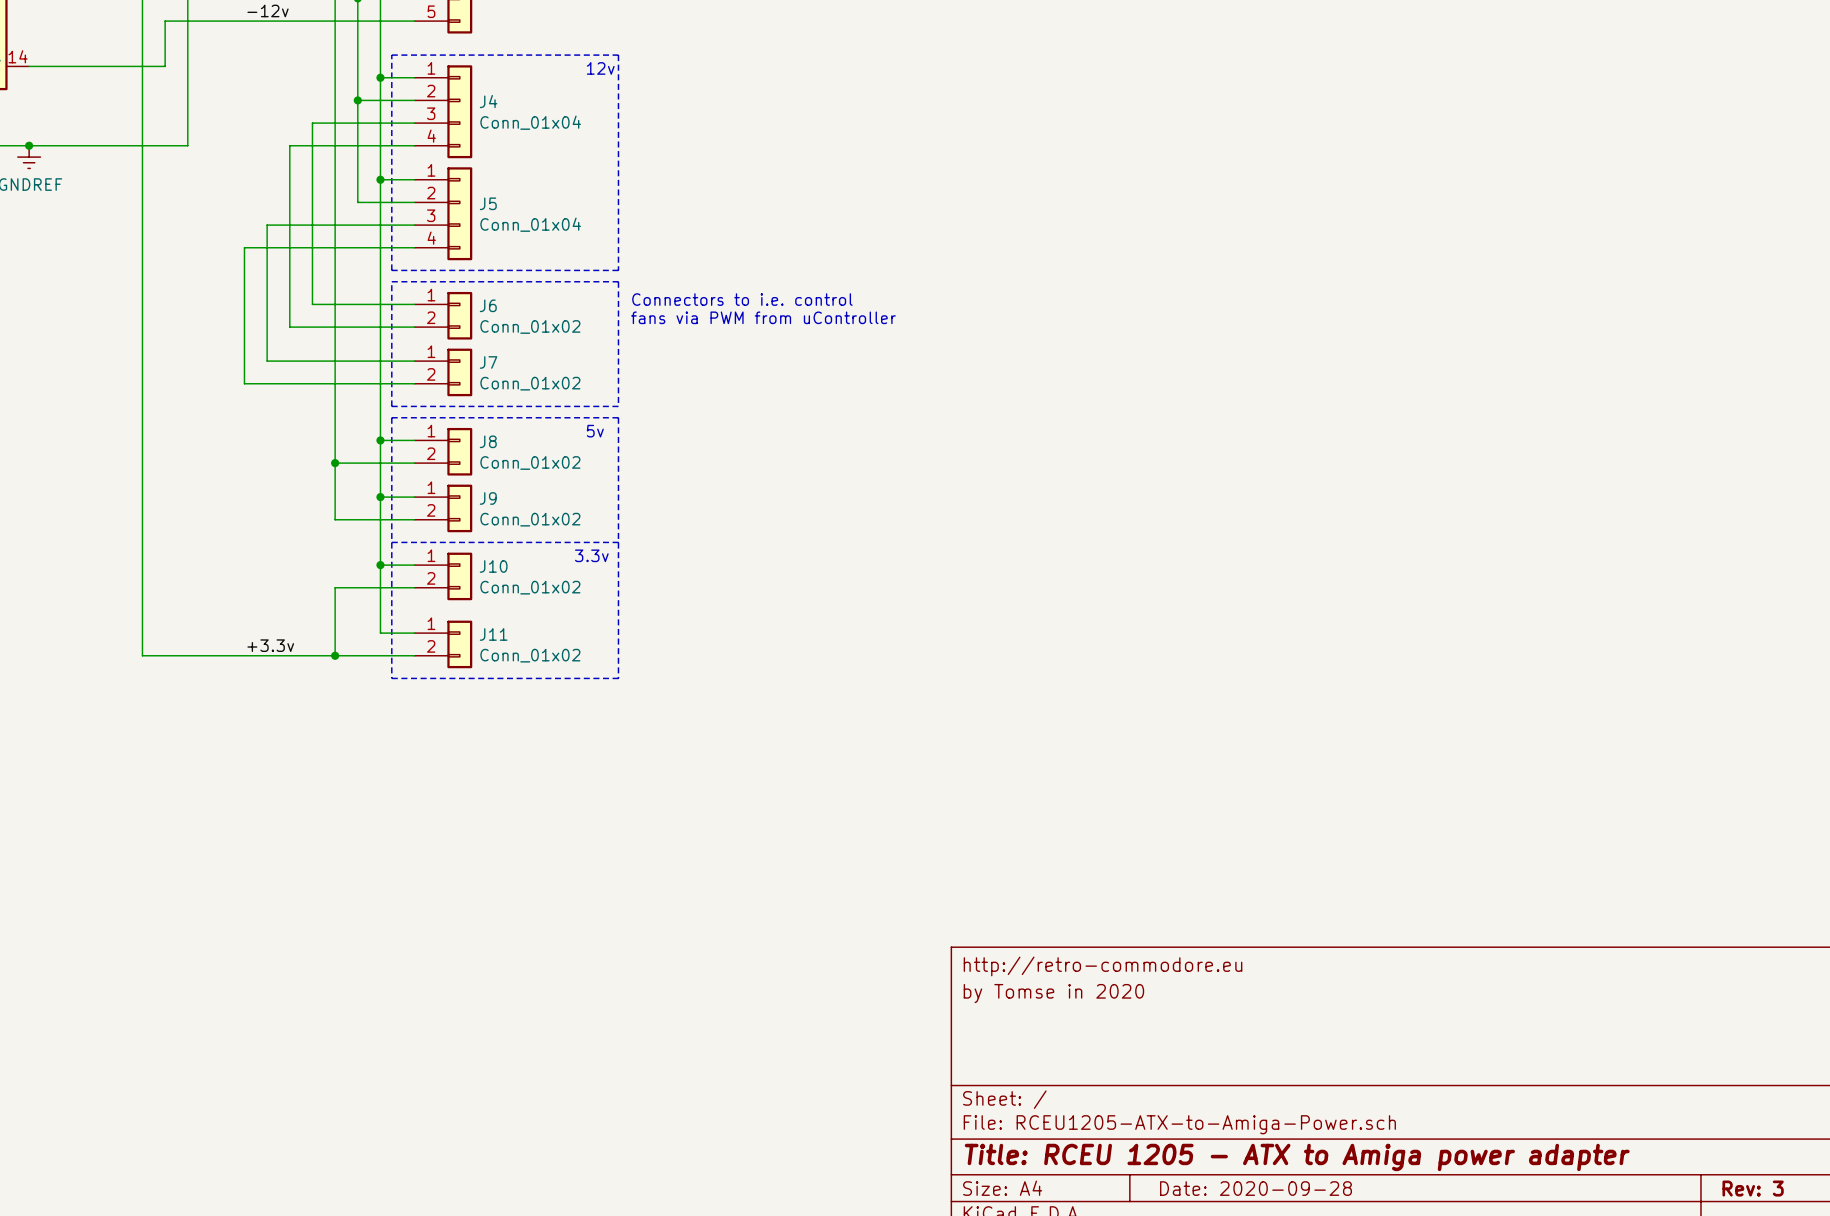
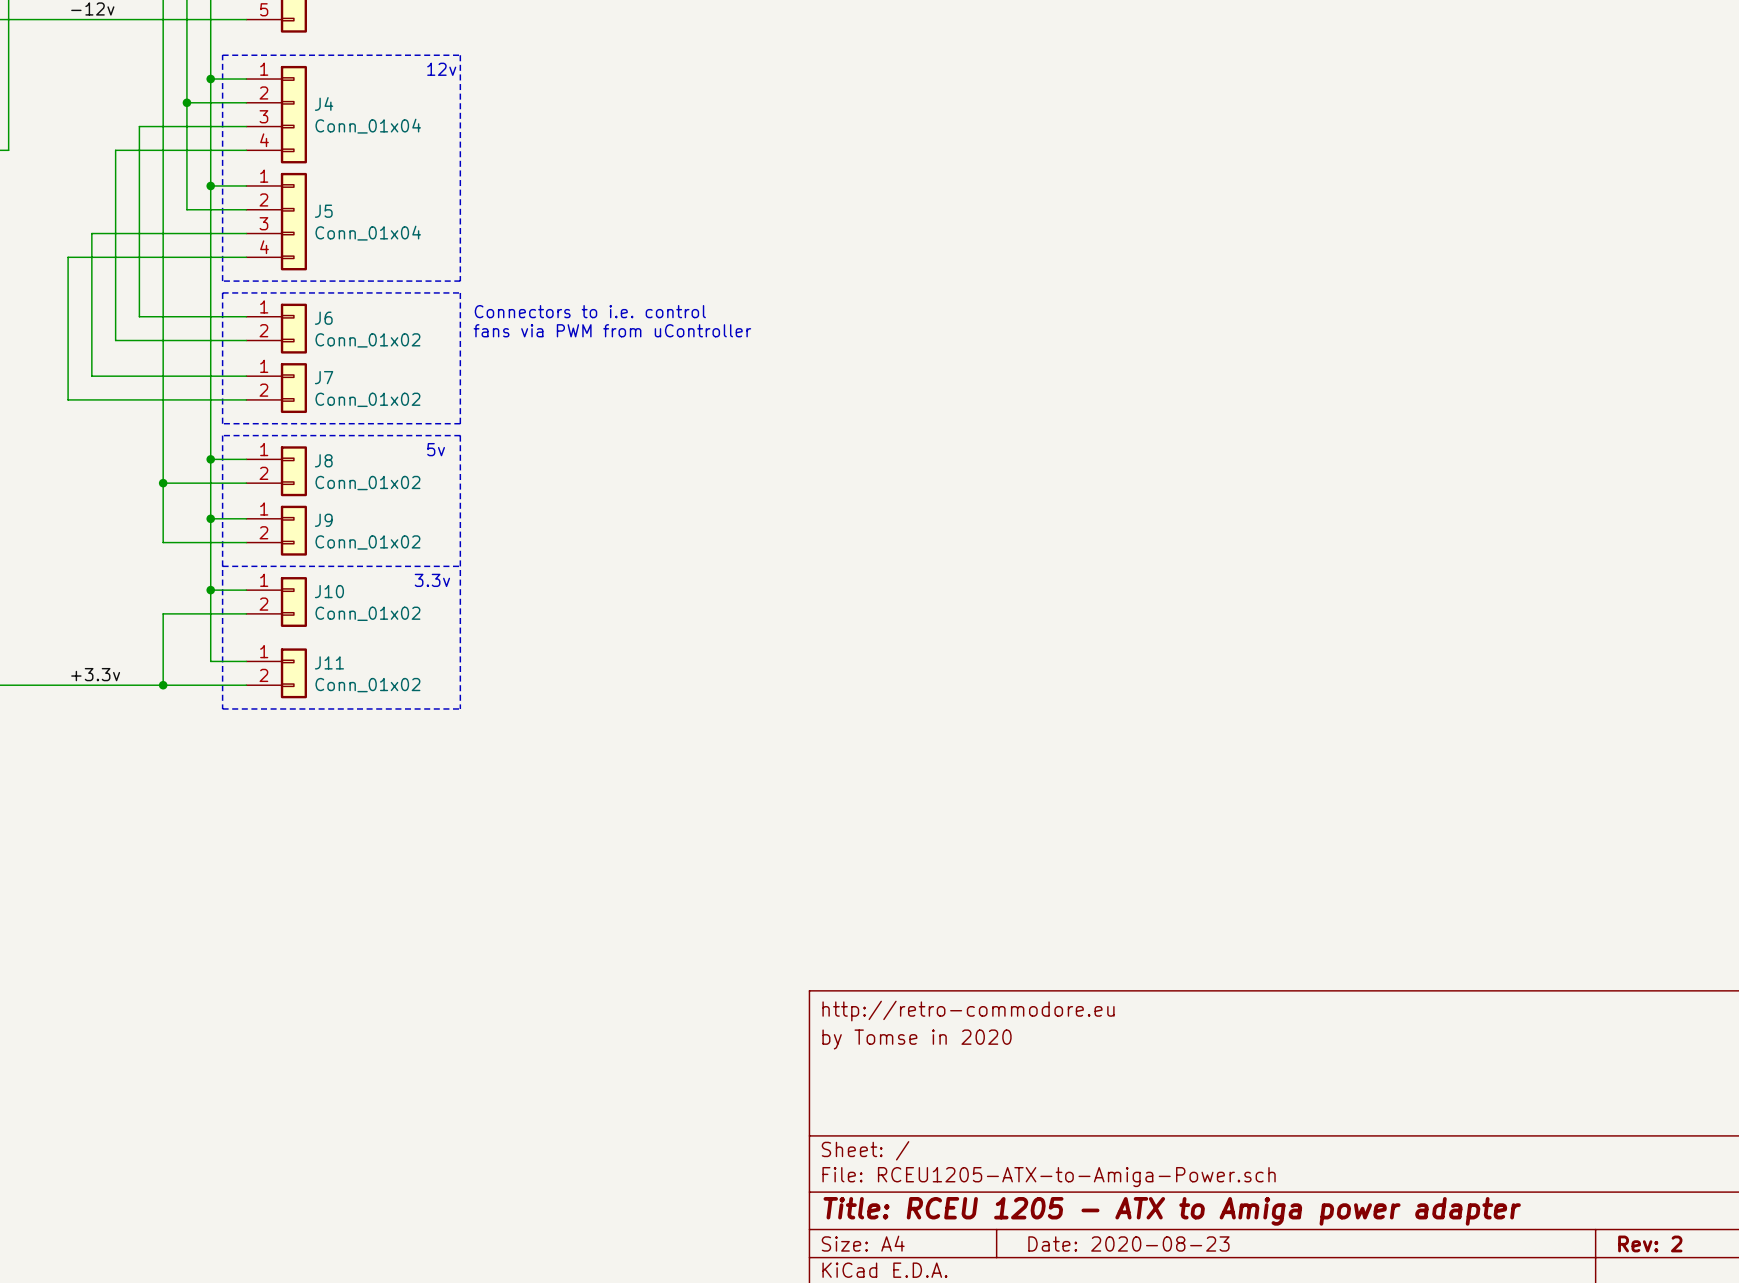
title block: Date: 2020-09-28 (1255, 1188) -> Date: 2020-08-23 (1128, 1243)
title block: Rev: 3 (1753, 1188) -> Rev: 2 (1650, 1243)

